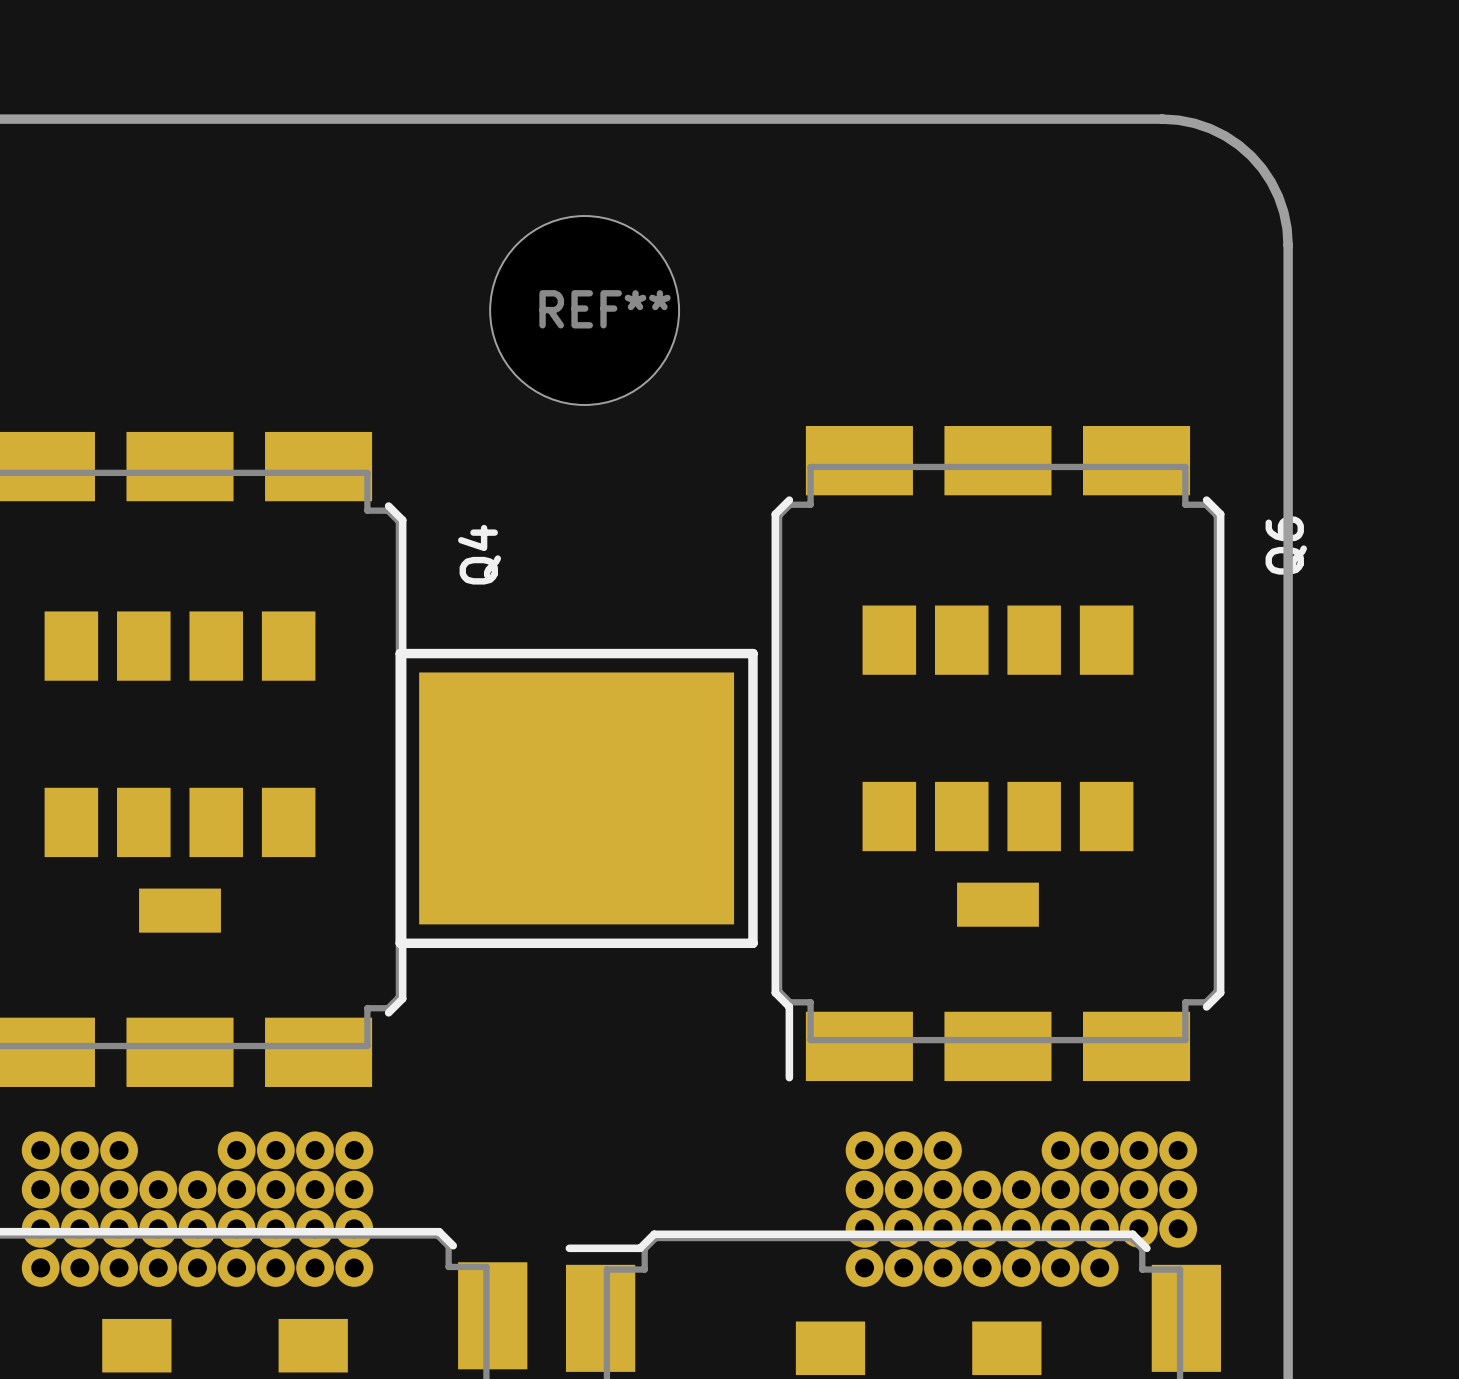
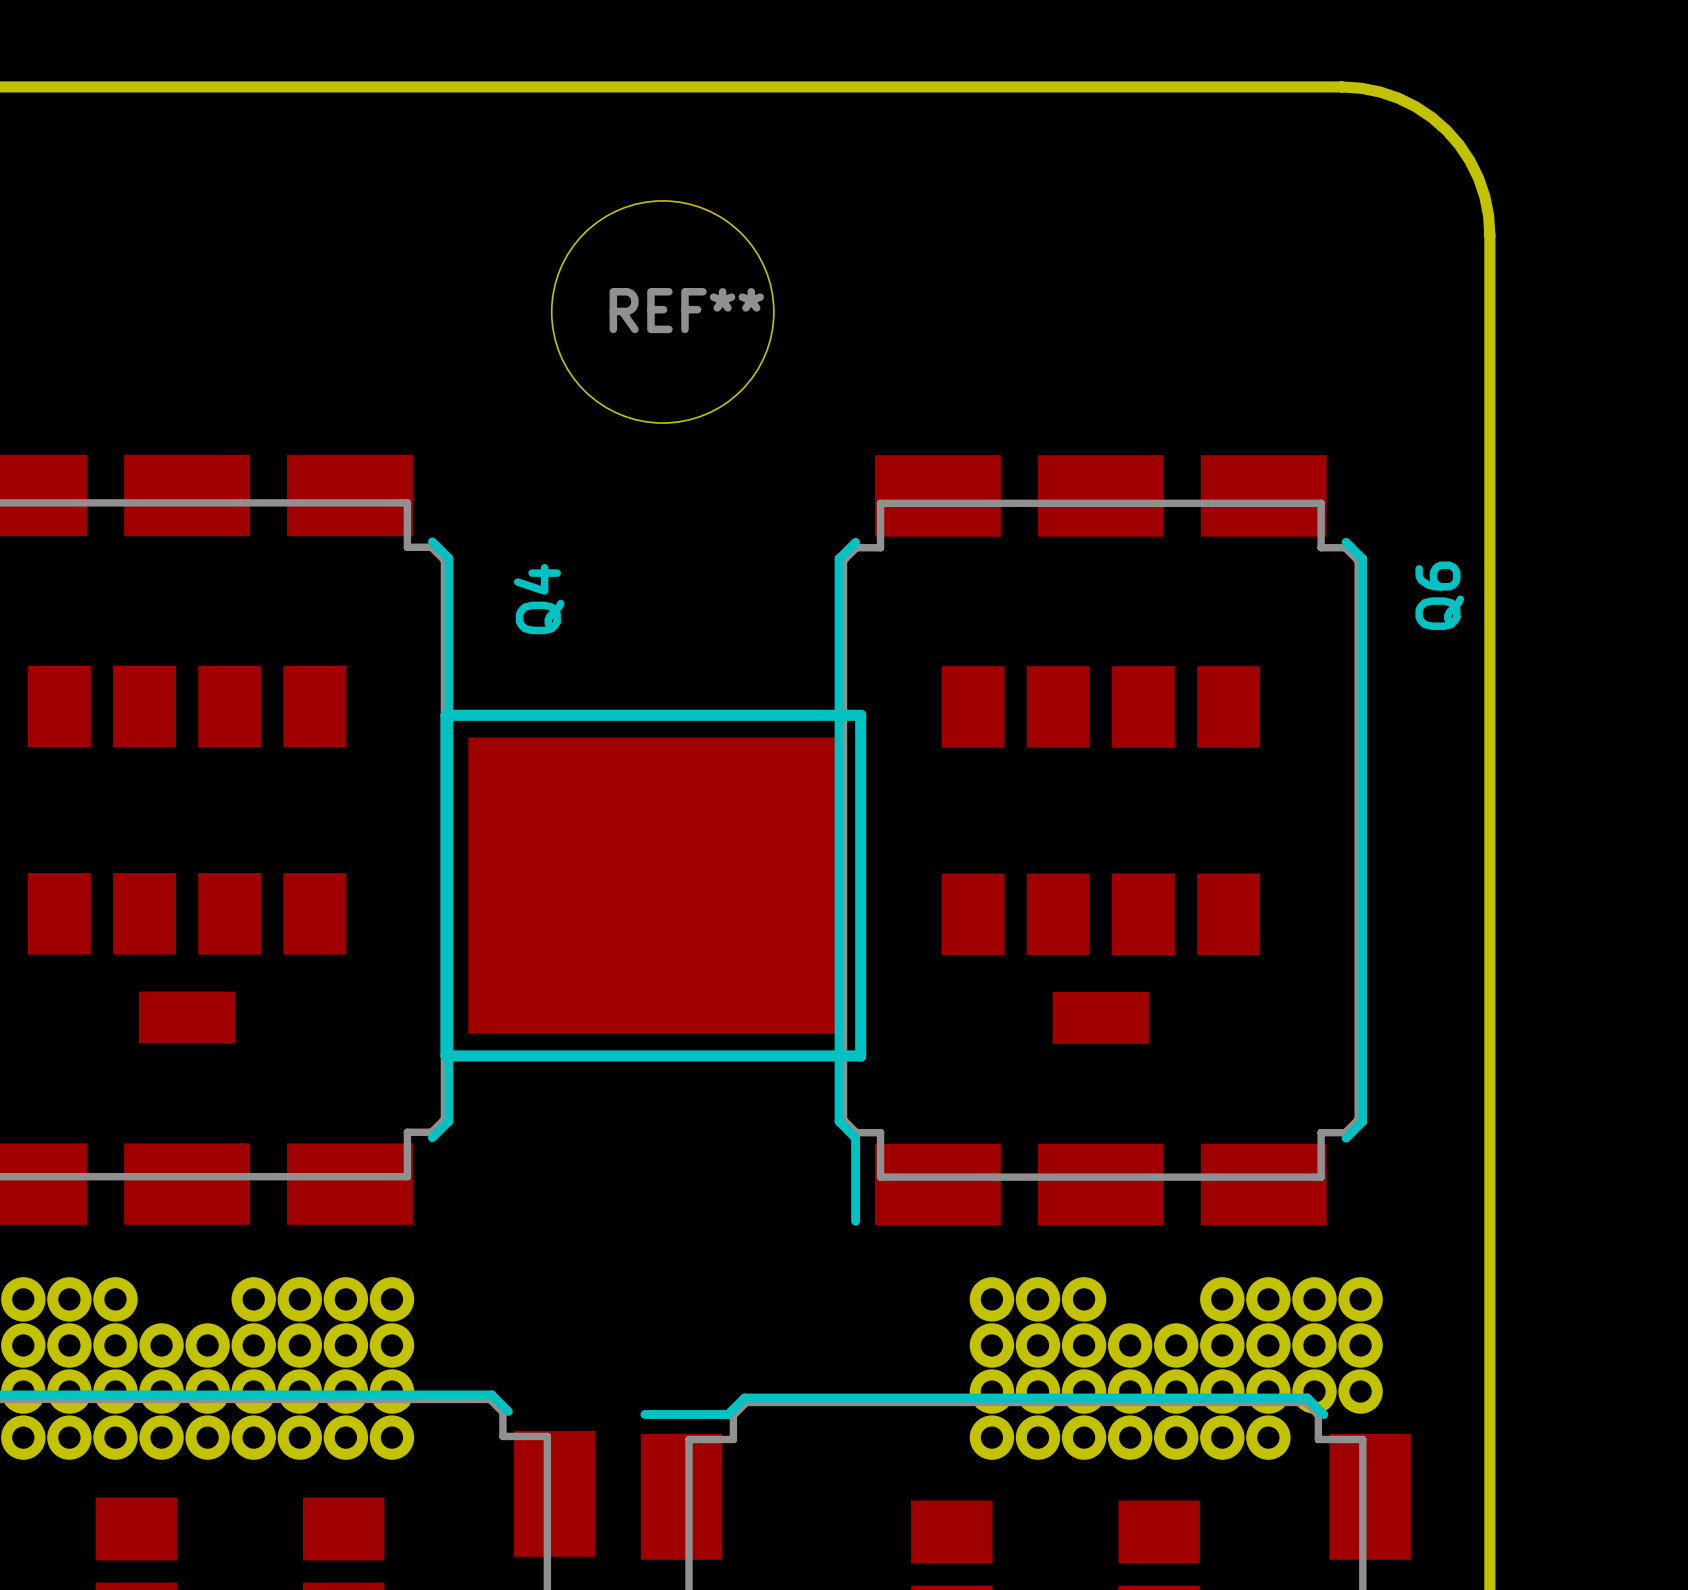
Q6 position: (997, 753) -> (1100, 840)

